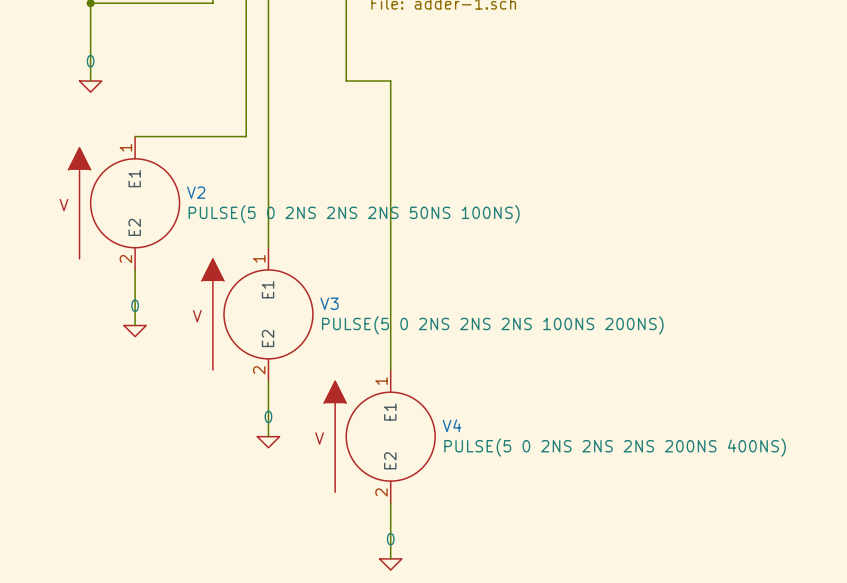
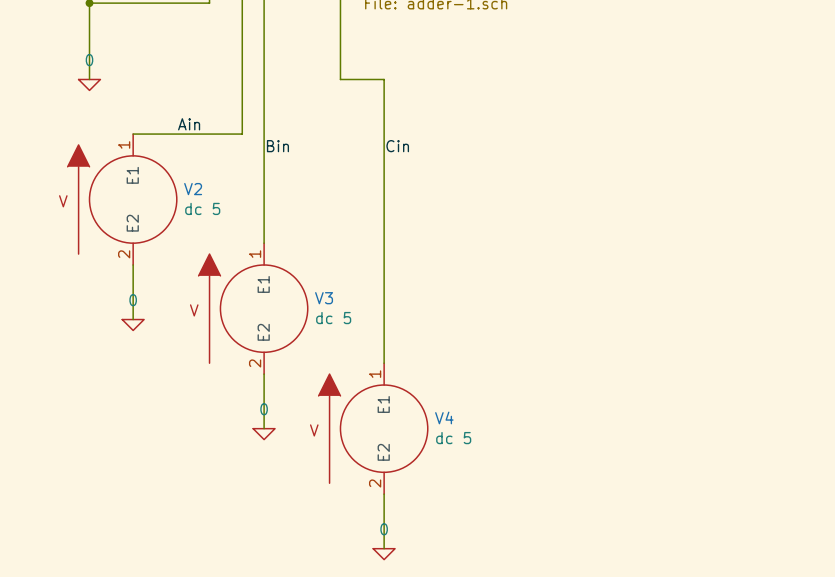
label: none -> Ain (189, 124)
label: none -> Bin (277, 146)
label: none -> Cin (397, 146)
V2 value: PULSE(5 0 2NS 2NS 2NS 50NS 100NS) (354, 214) -> dc 5 (202, 208)
V3 value: PULSE(5 0 2NS 2NS 2NS 100NS 200NS) (492, 325) -> dc 5 (333, 318)
V4 value: PULSE(5 0 2NS 2NS 2NS 200NS 400NS) (615, 447) -> dc 5 (453, 438)

